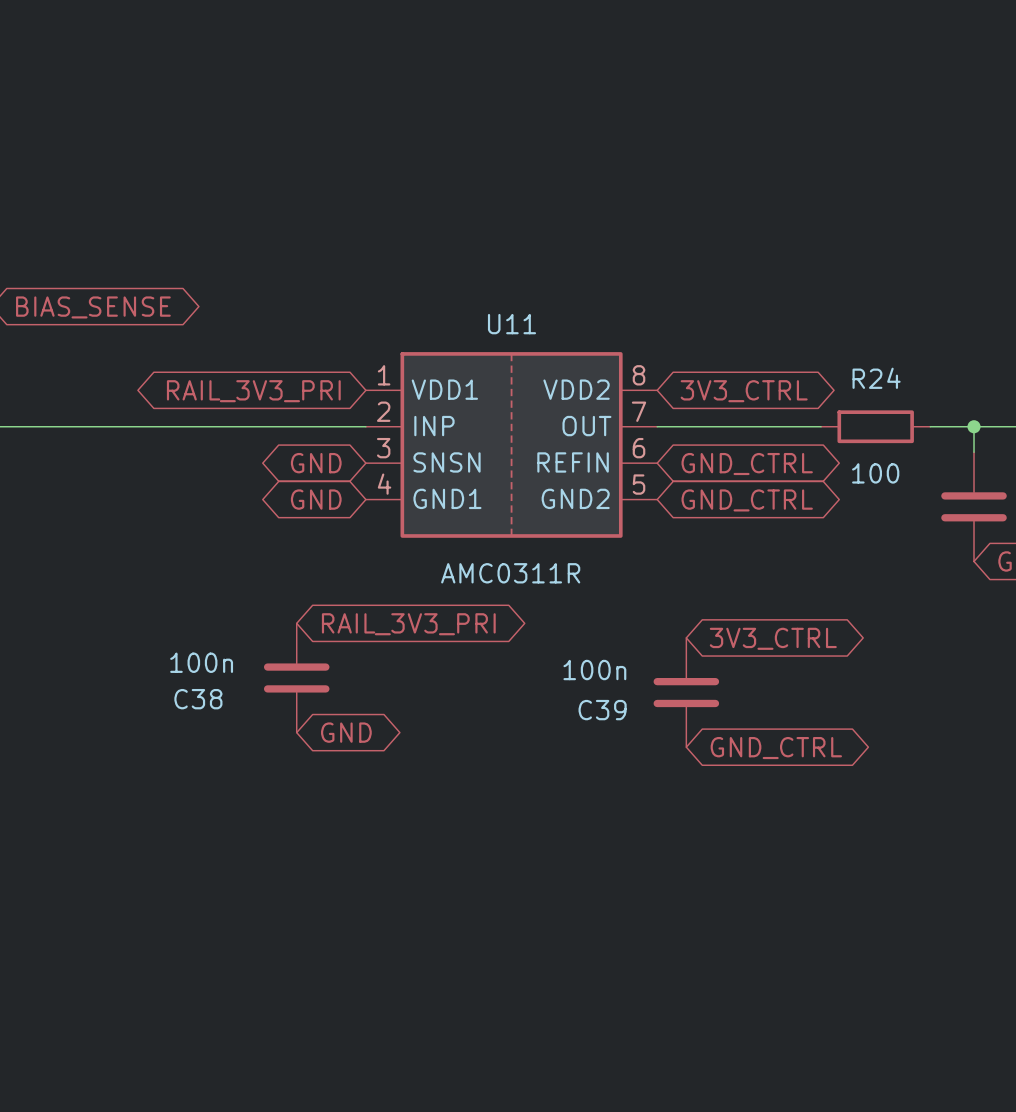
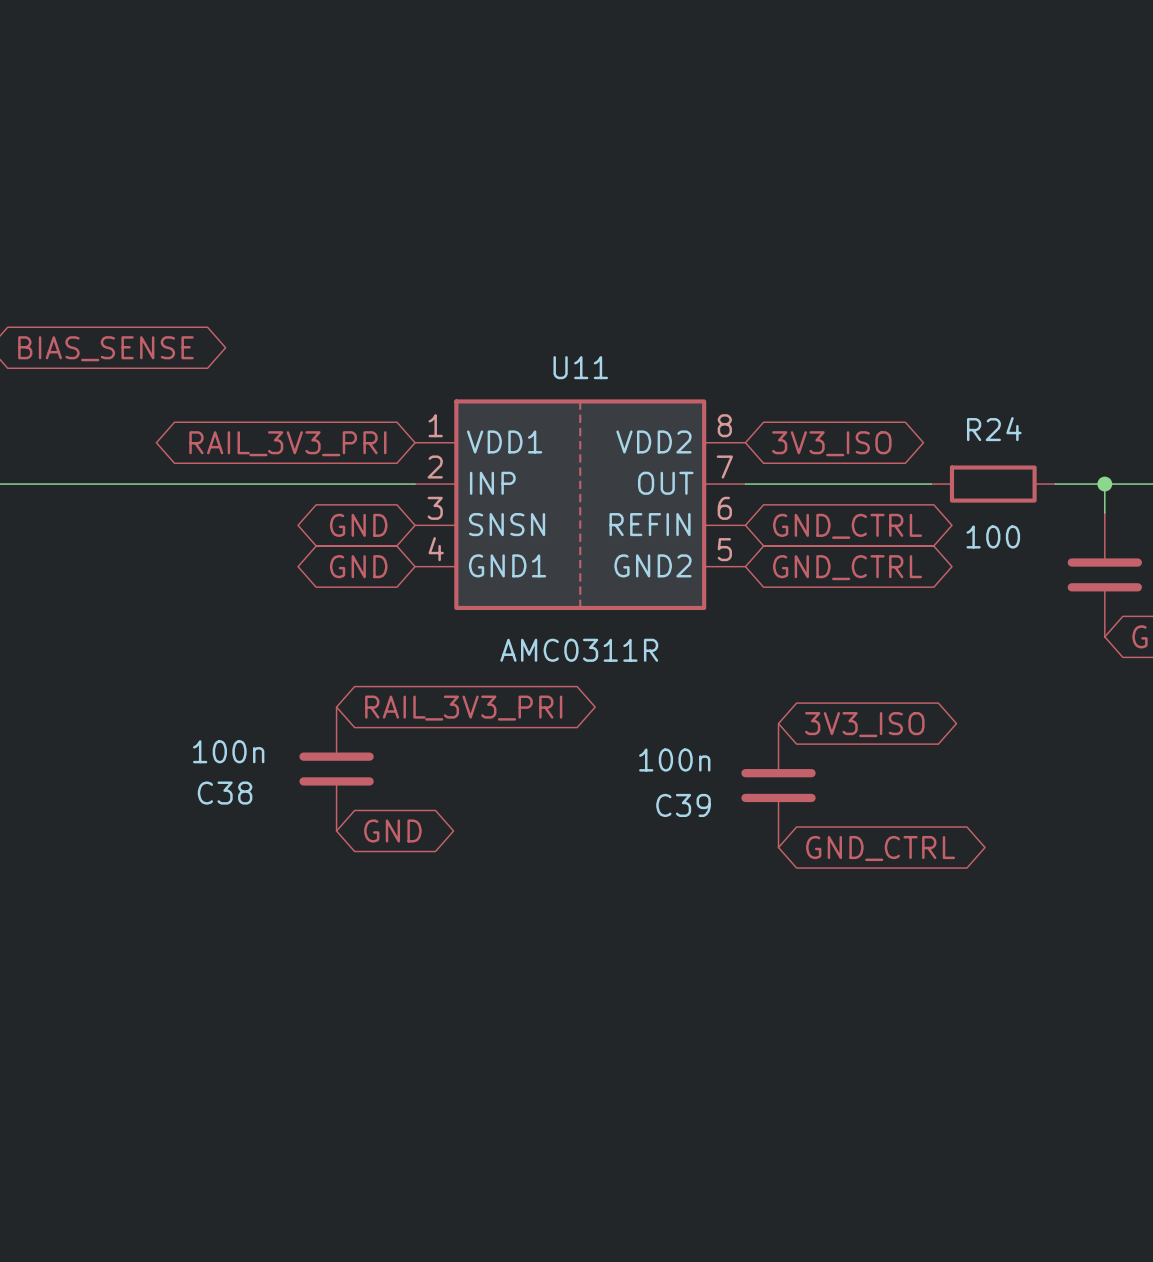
global label: 3V3_CTRL (744, 391) -> 3V3_ISO (831, 443)
global label: 3V3_CTRL (773, 638) -> 3V3_ISO (864, 724)

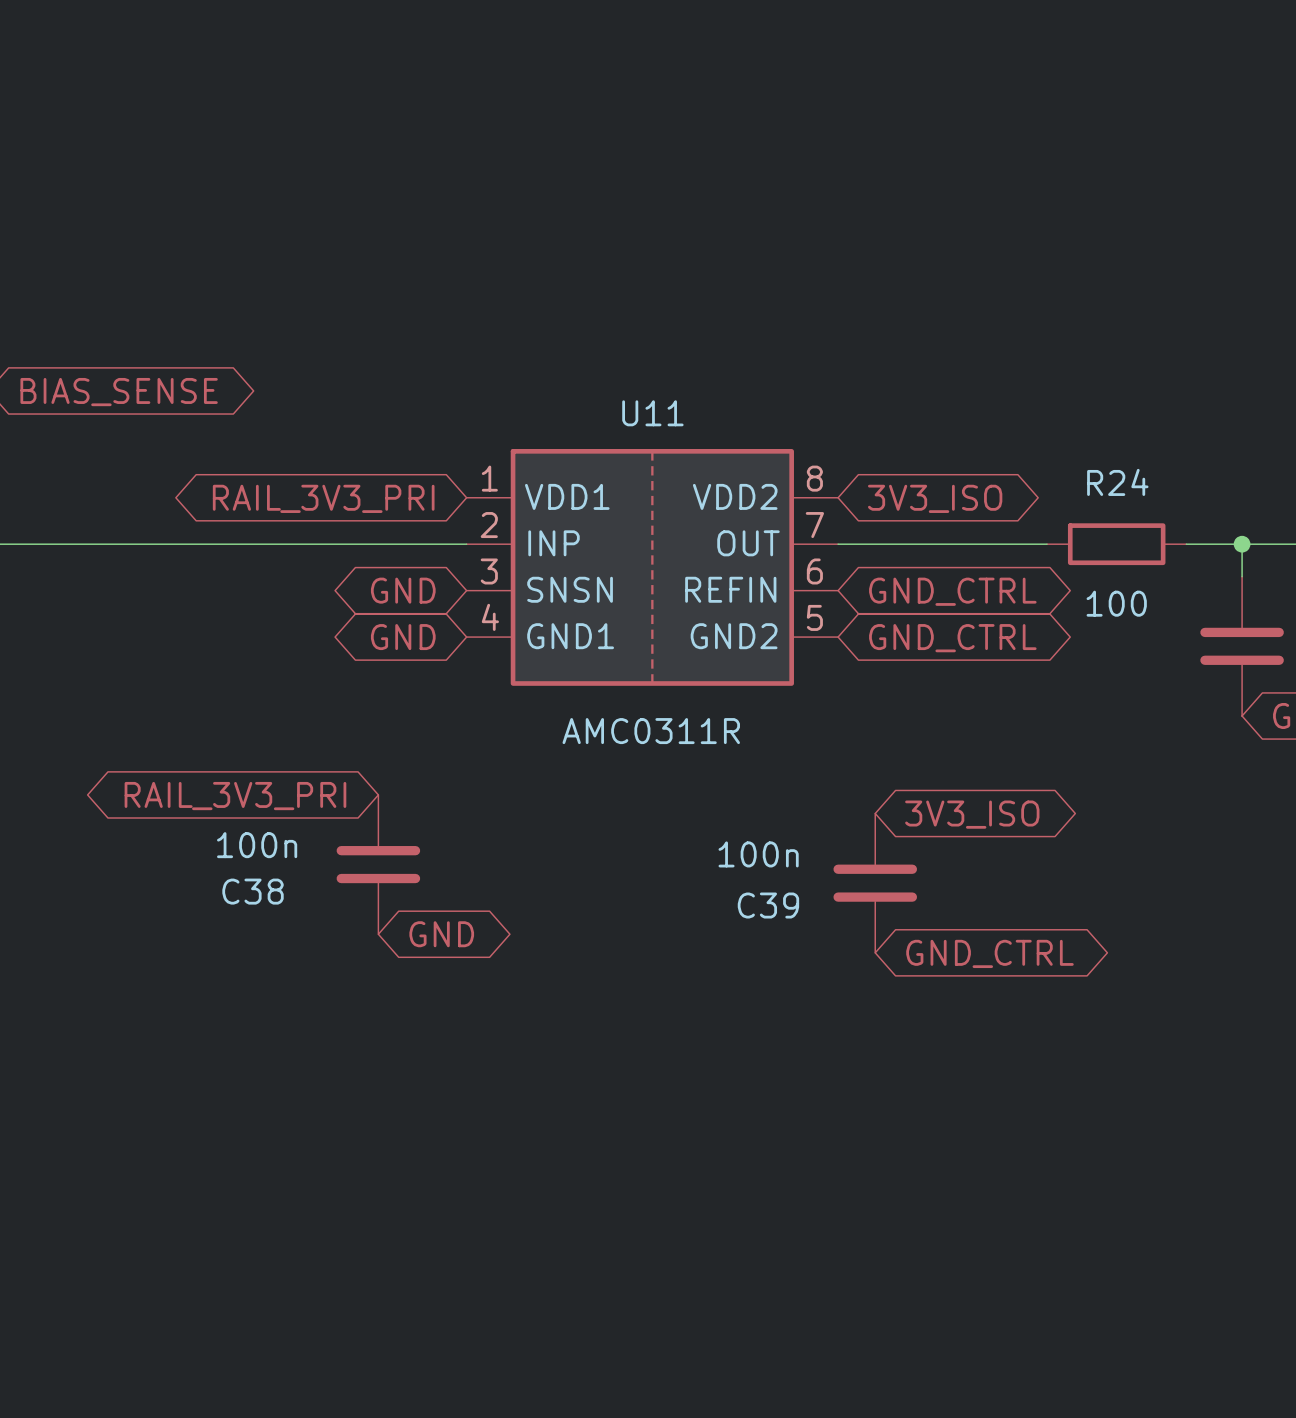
global label rotation: 0° (463, 708) -> 180° (235, 796)

